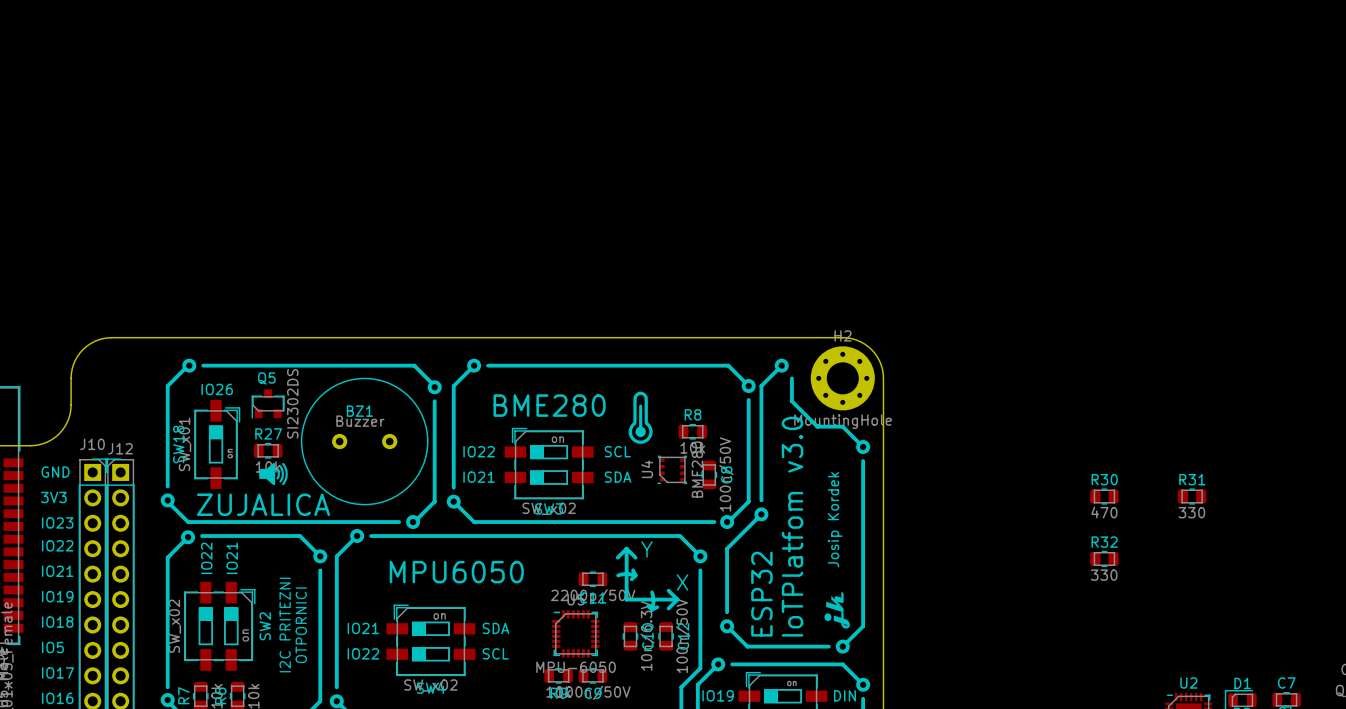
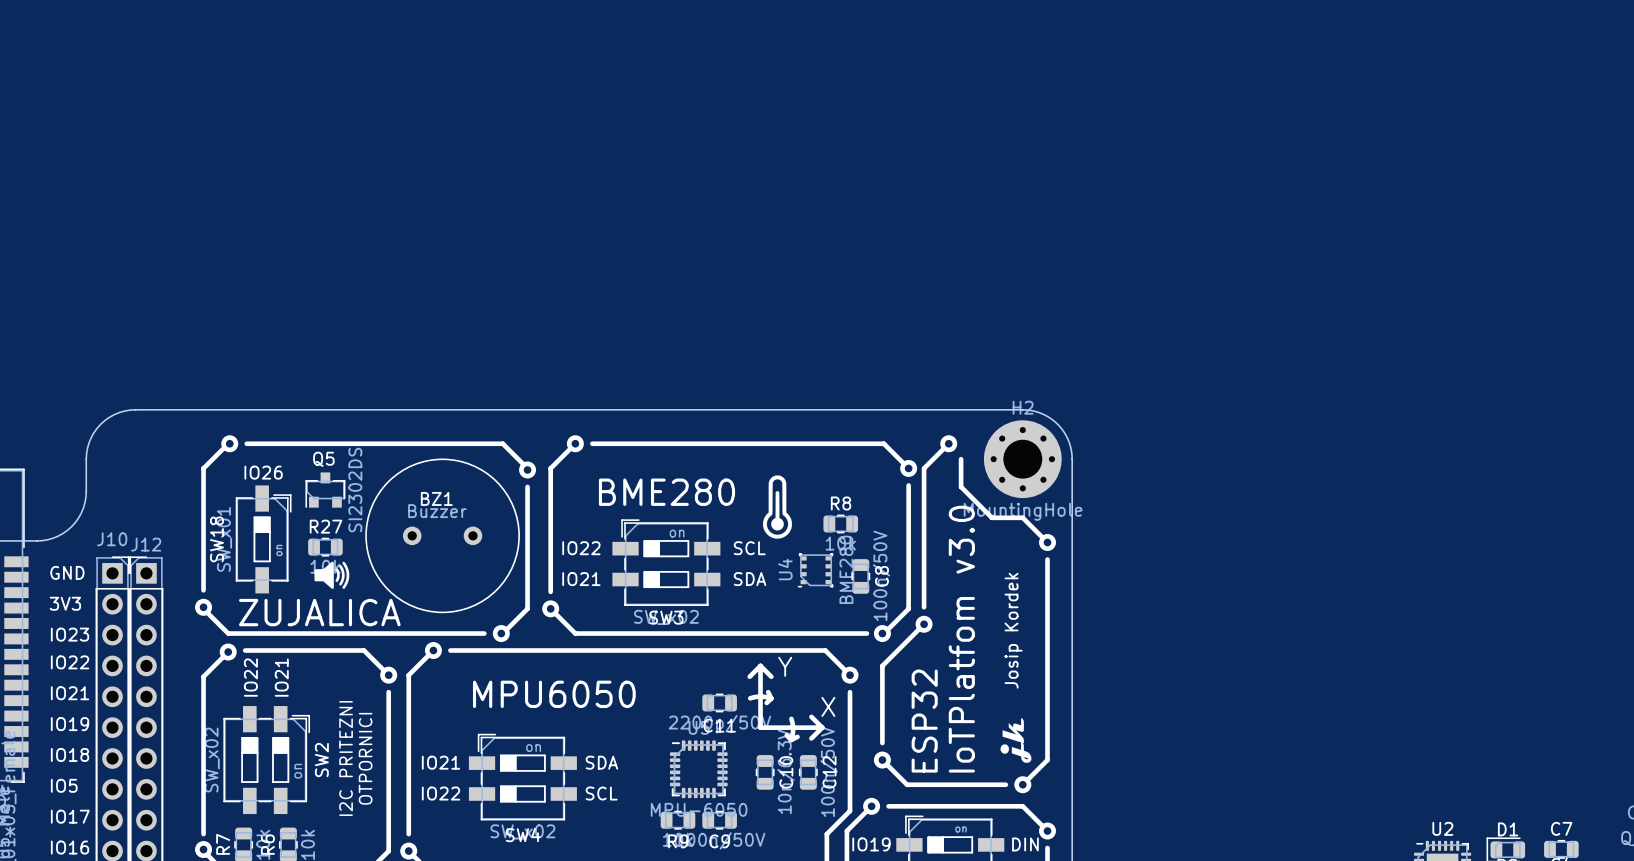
R30: 470 (1104, 496) -> none
R31: 330 (1192, 496) -> none
R32: 330 (1104, 558) -> none

